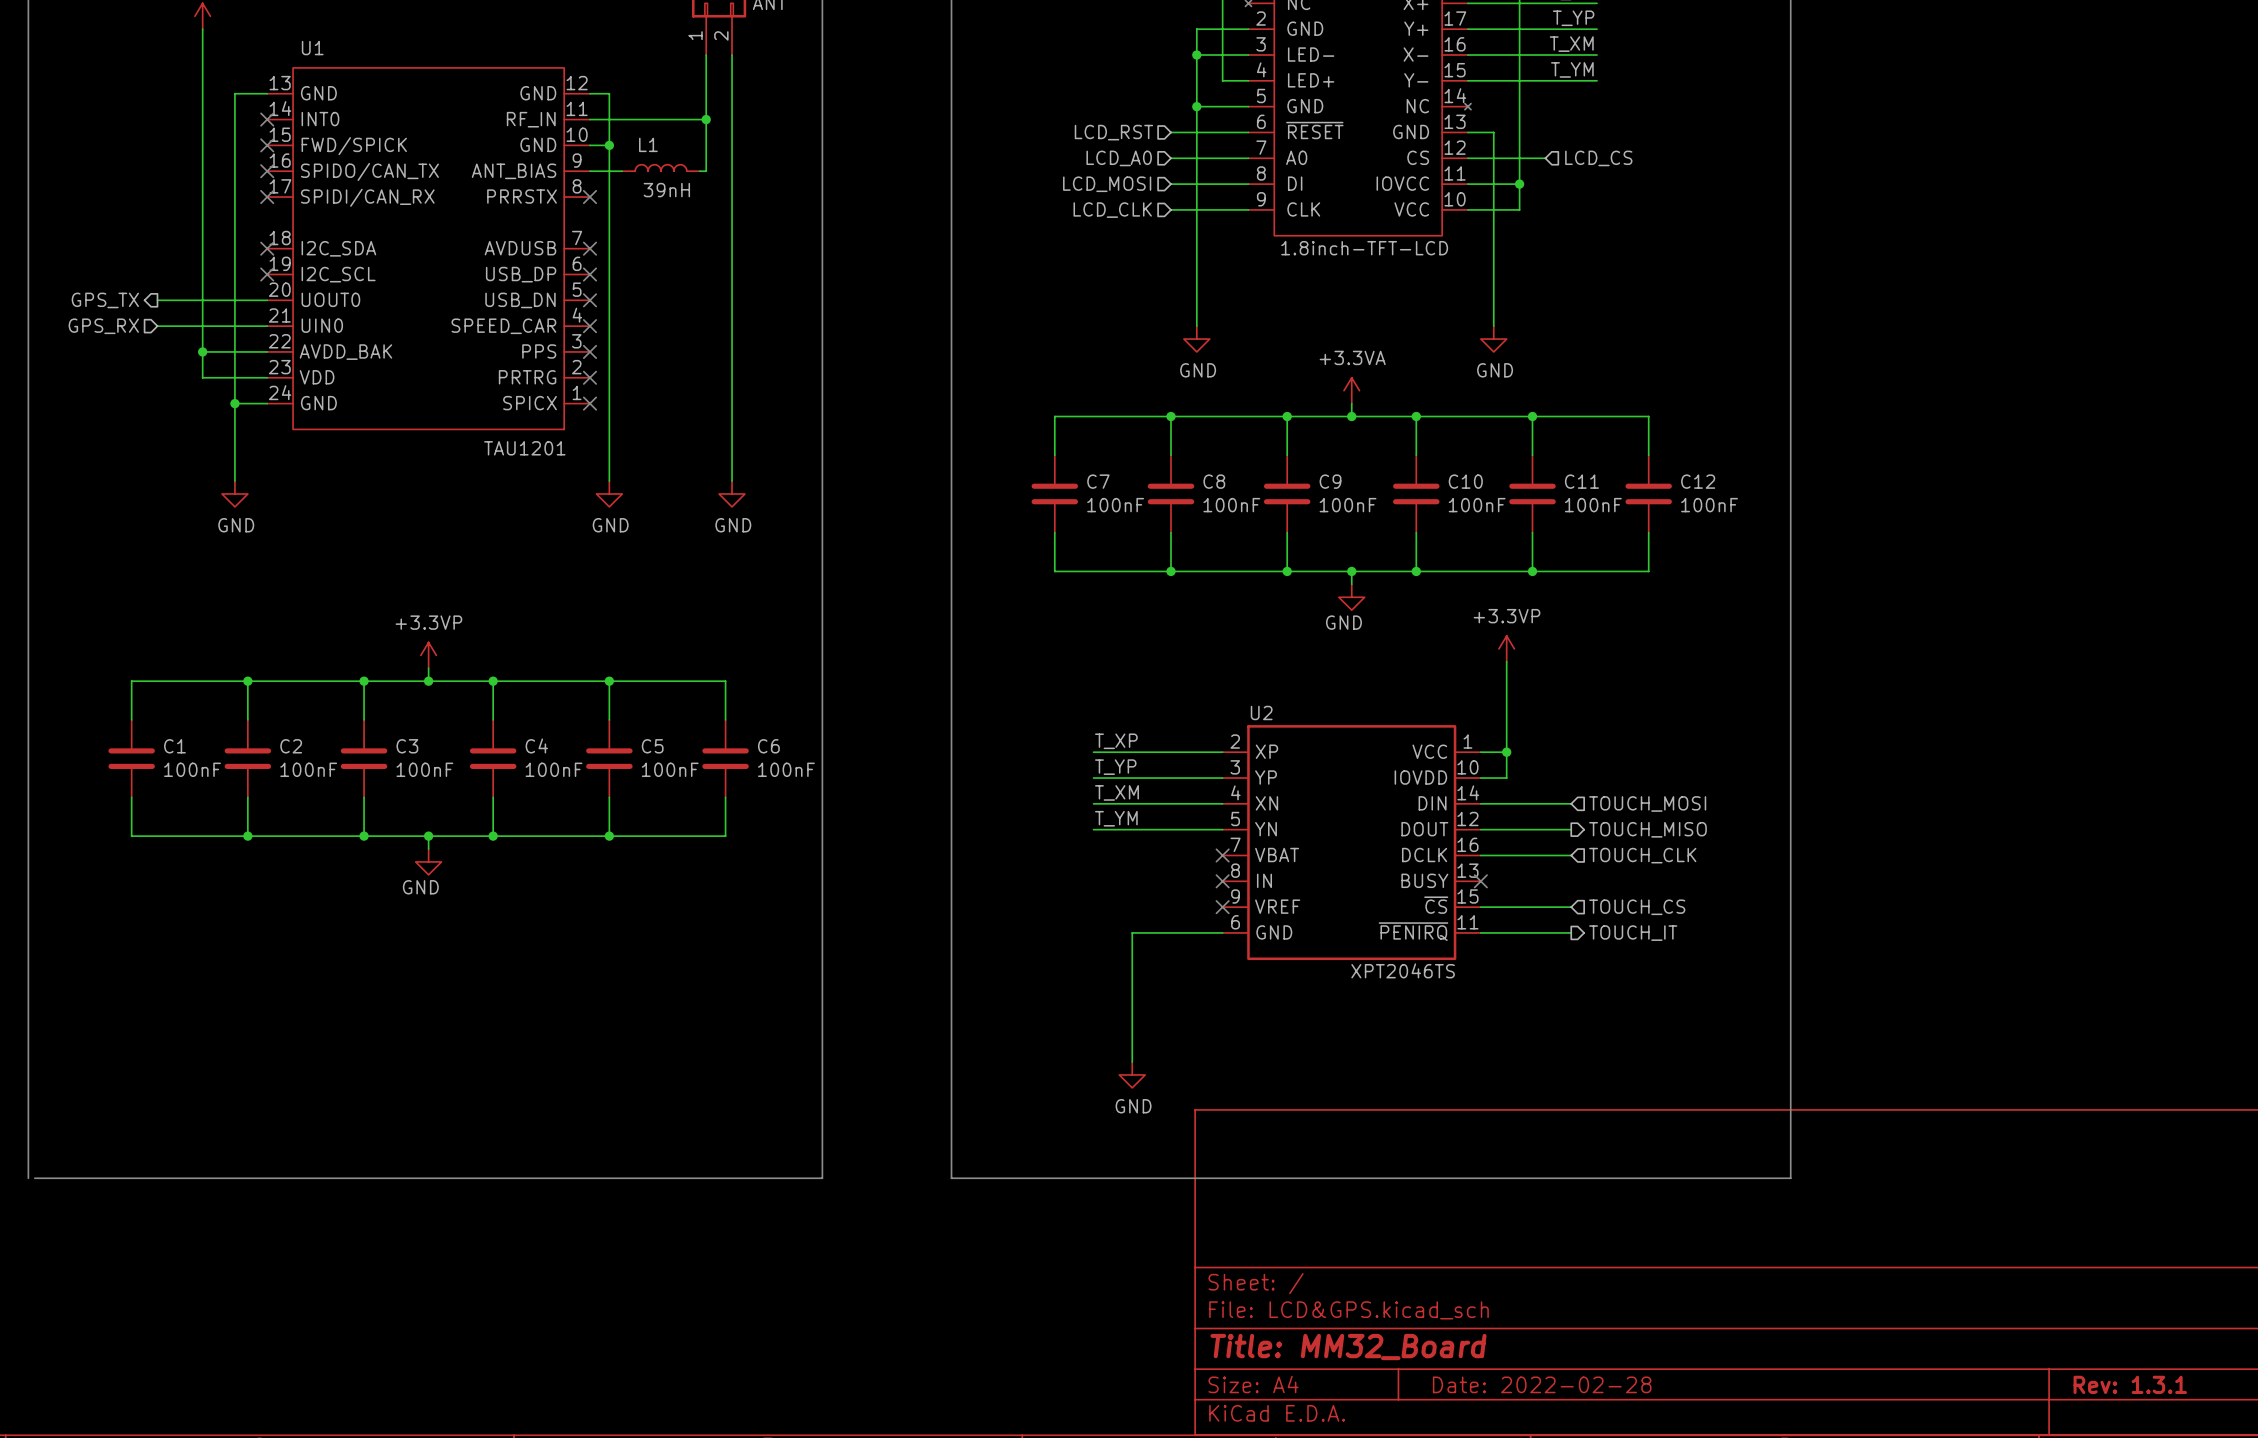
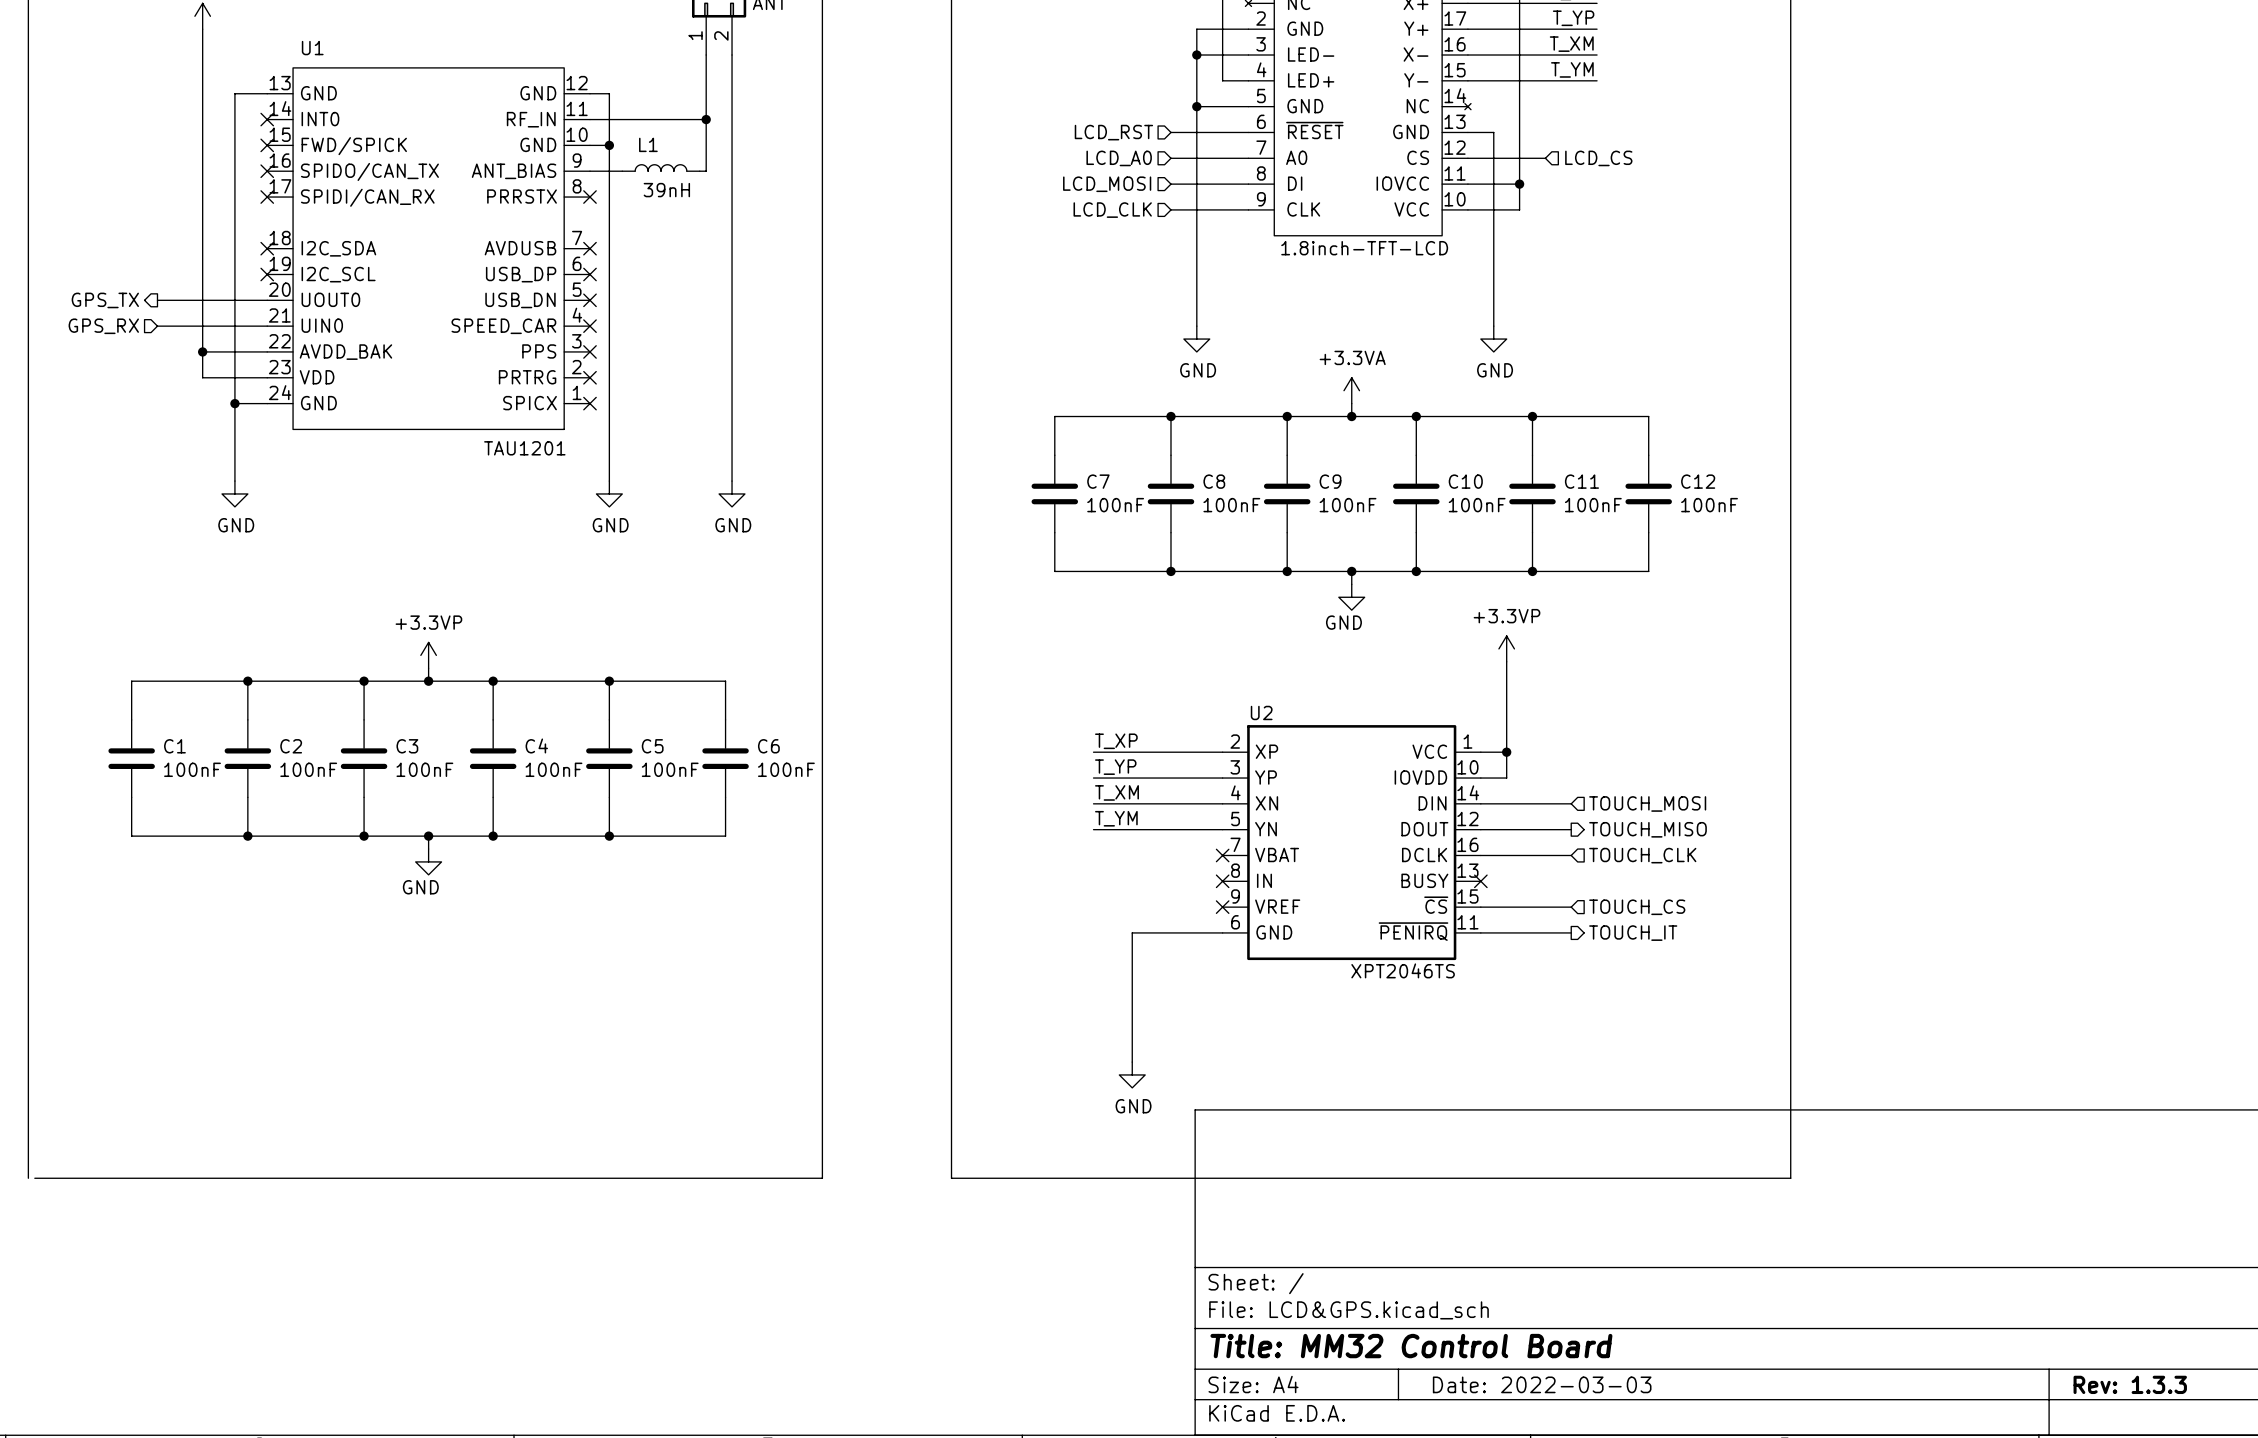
title block: Title: MM32_Board (1348, 1347) -> Title: MM32 Control Board (1411, 1346)
title block: Date: 2022-02-28 (1542, 1384) -> Date: 2022-03-03 (1542, 1384)
title block: Rev: 1.3.1 (2130, 1384) -> Rev: 1.3.3 (2130, 1384)

